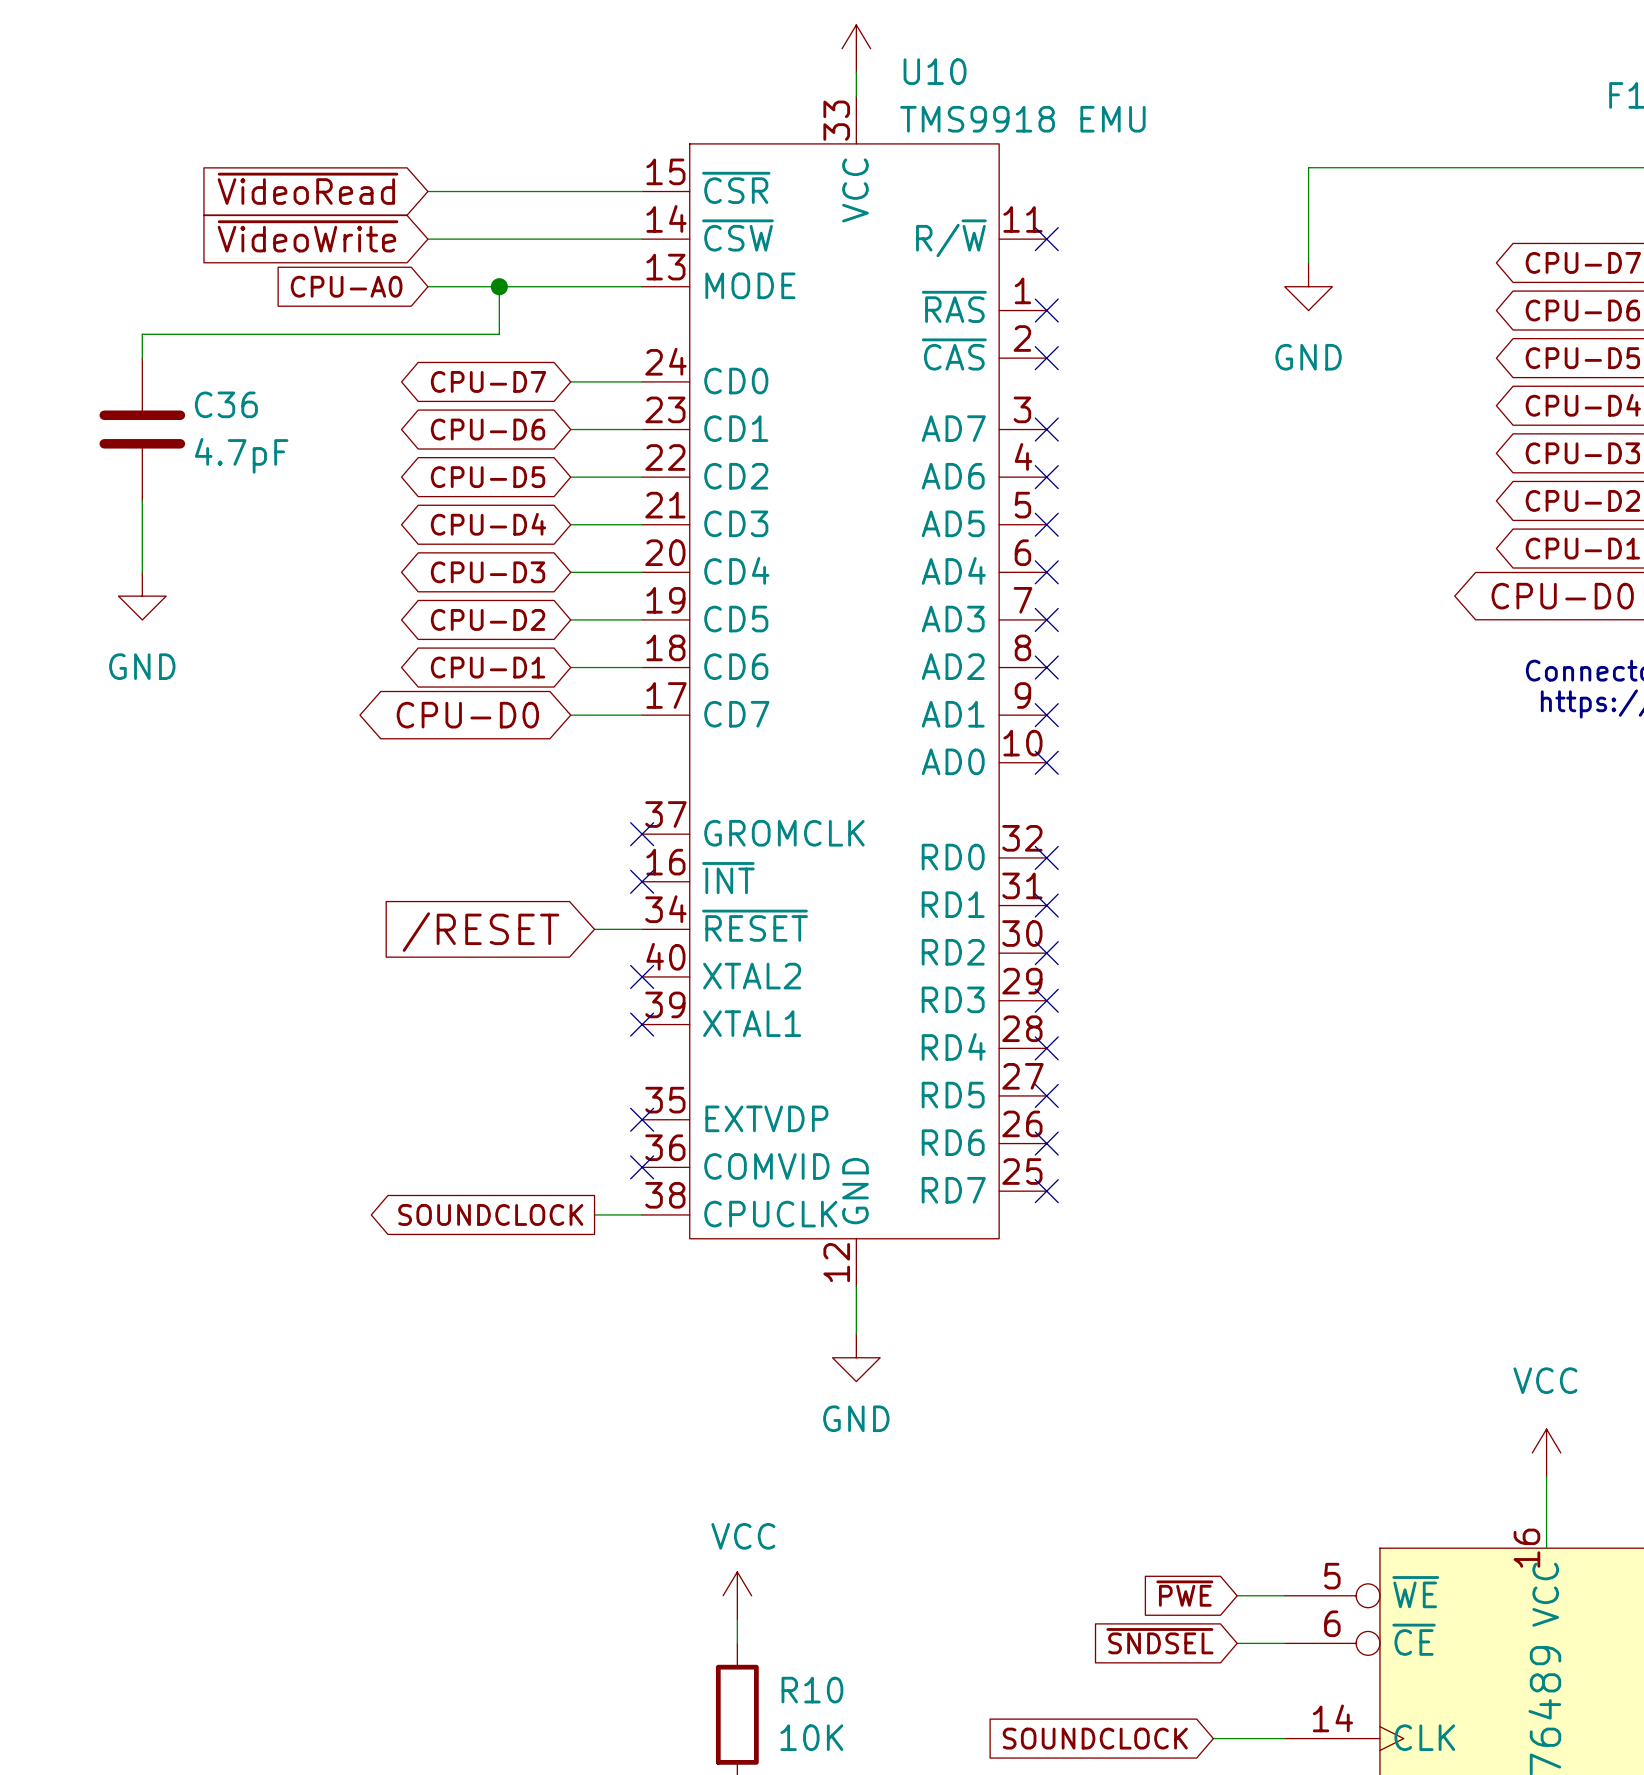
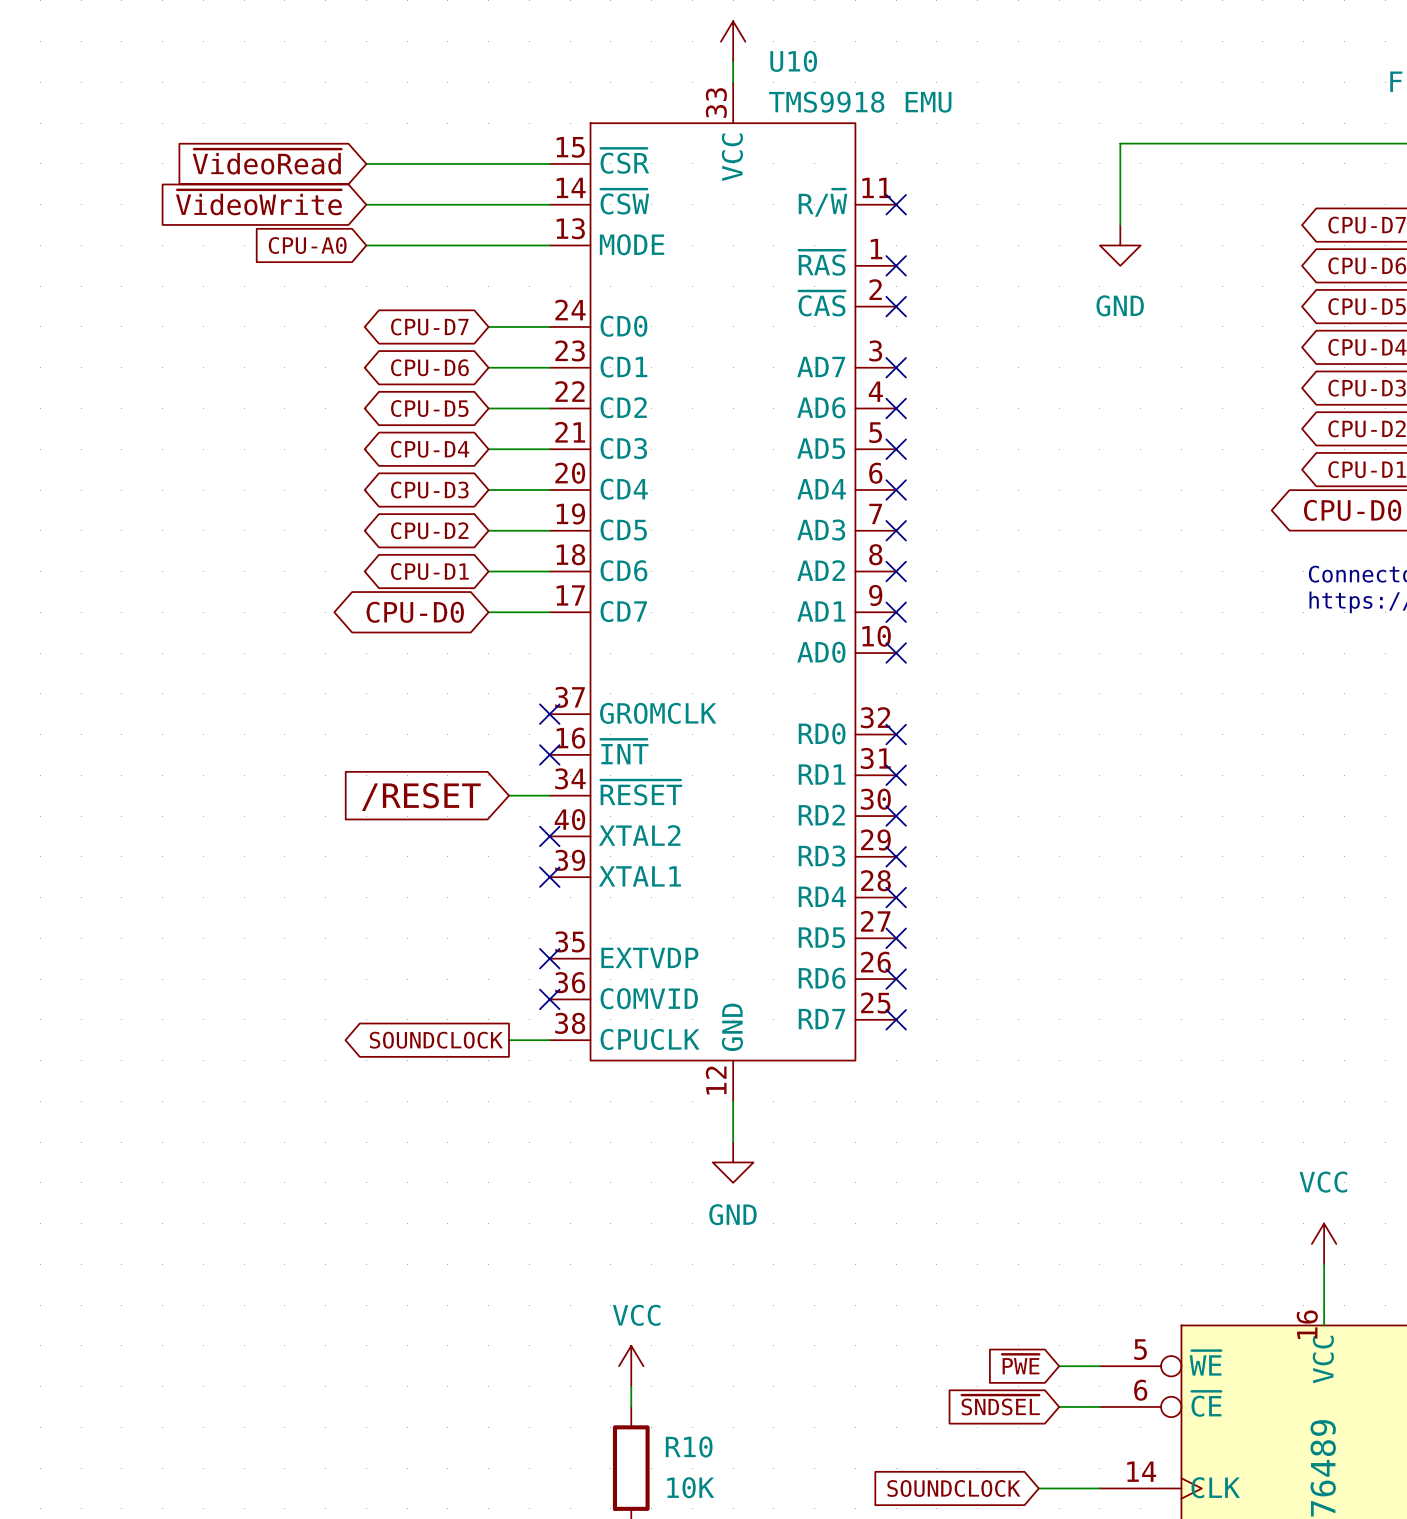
wire: (499, 286) (499, 334) (142, 334) (142, 358) -> none
junction: (499, 286) -> none
C36: 4.7pF (142, 429) -> none
wire: (142, 500) (142, 572) -> none
power symbol: GND (142, 596) -> none

